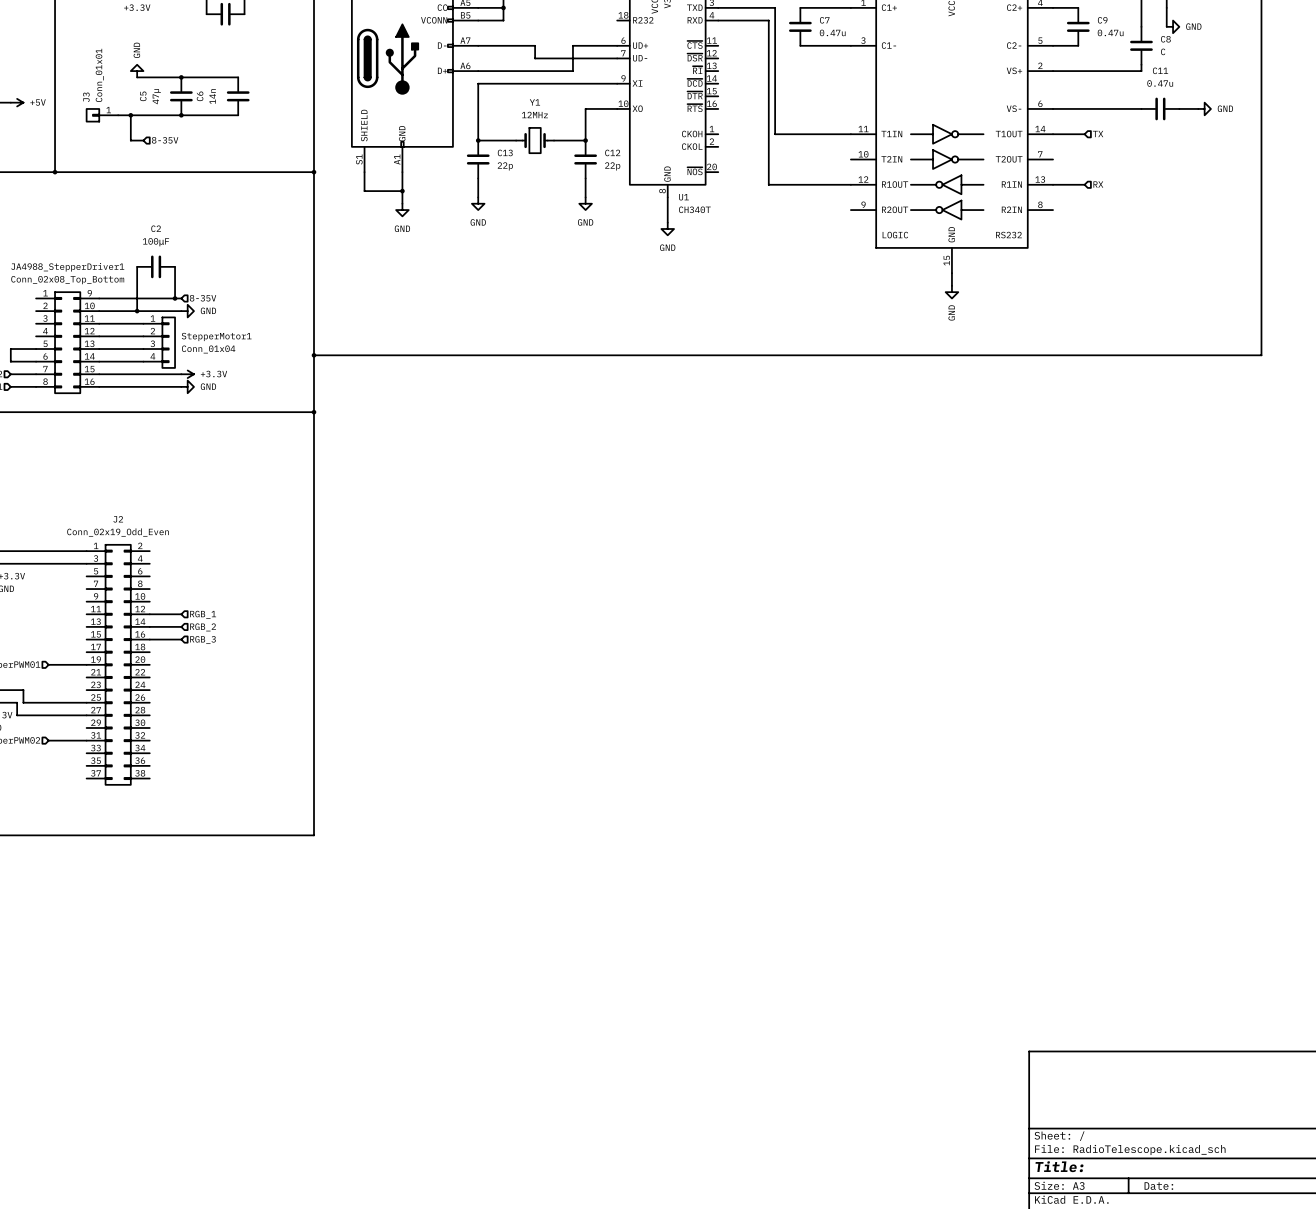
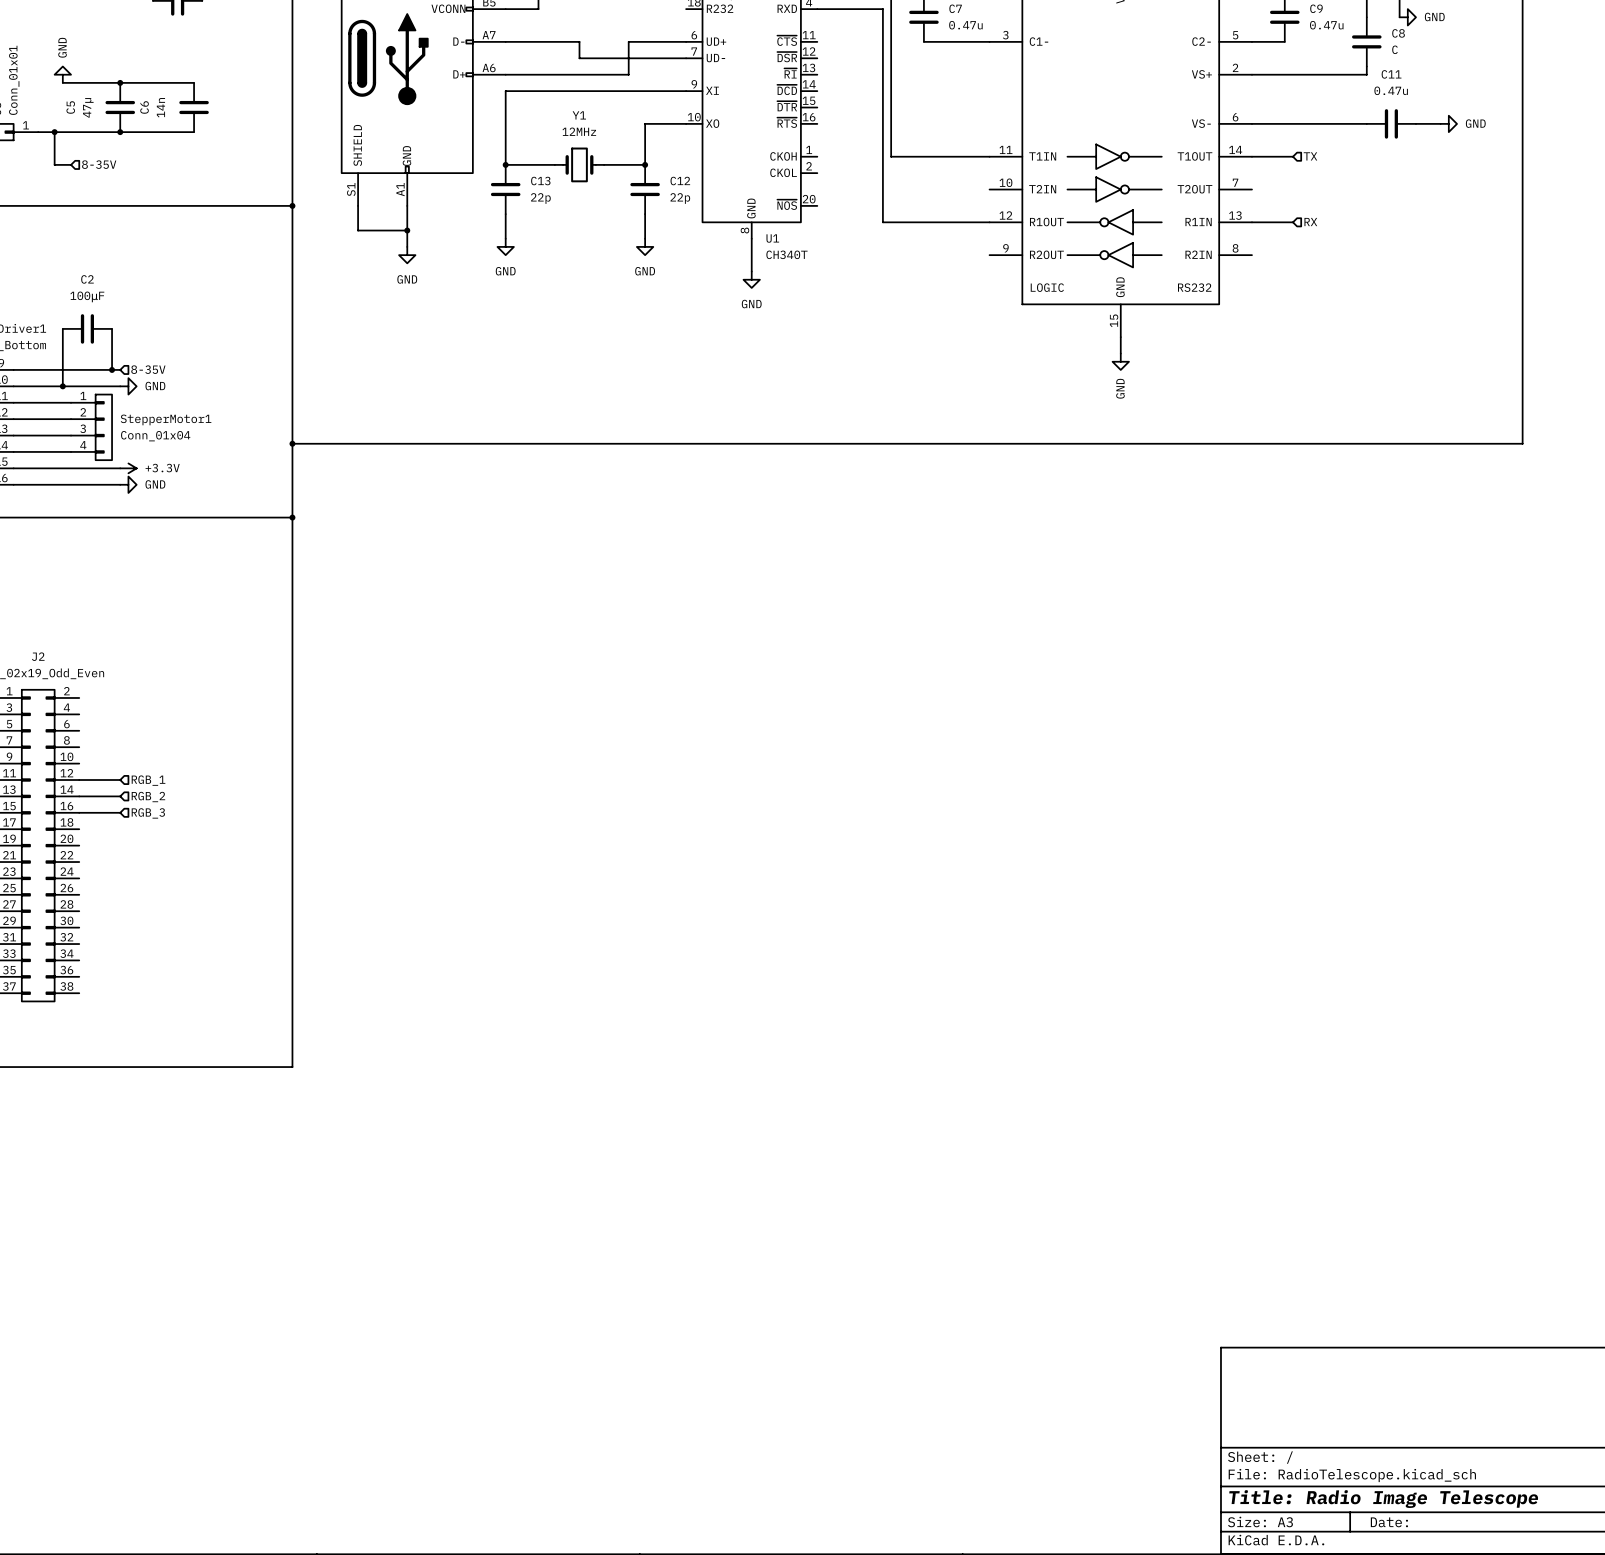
title block: Title: (1059, 1166) -> Title: Radio Image Telescope (1383, 1499)

